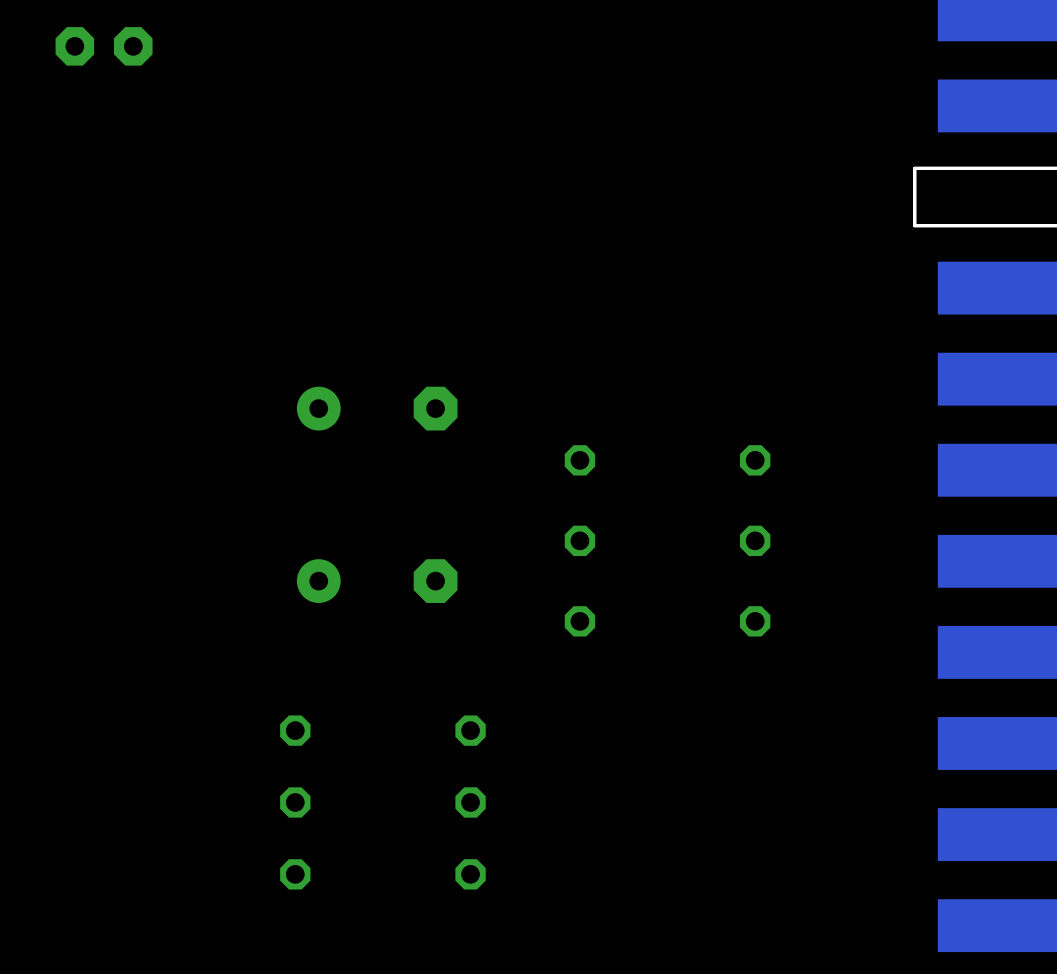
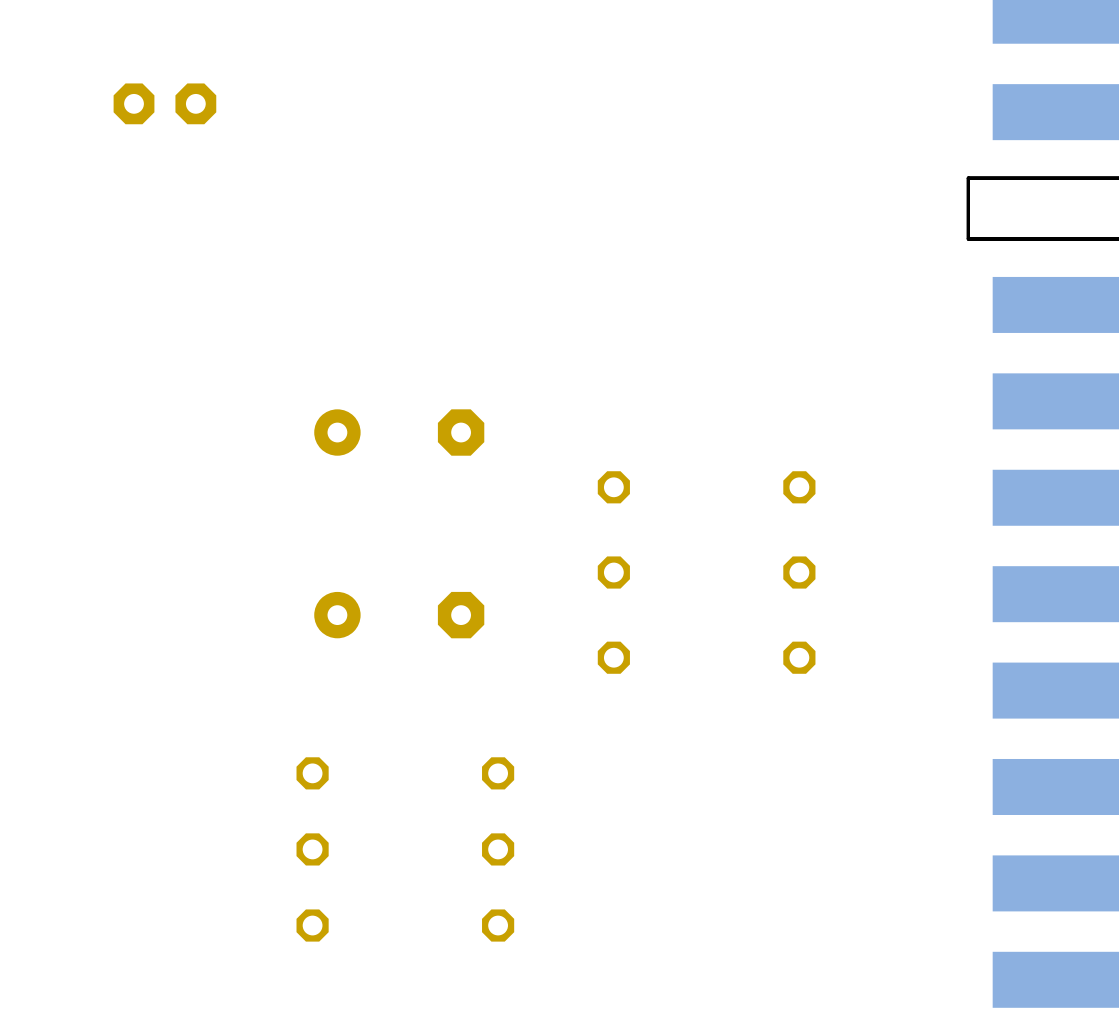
part position: (104, 46) -> (164, 103)

